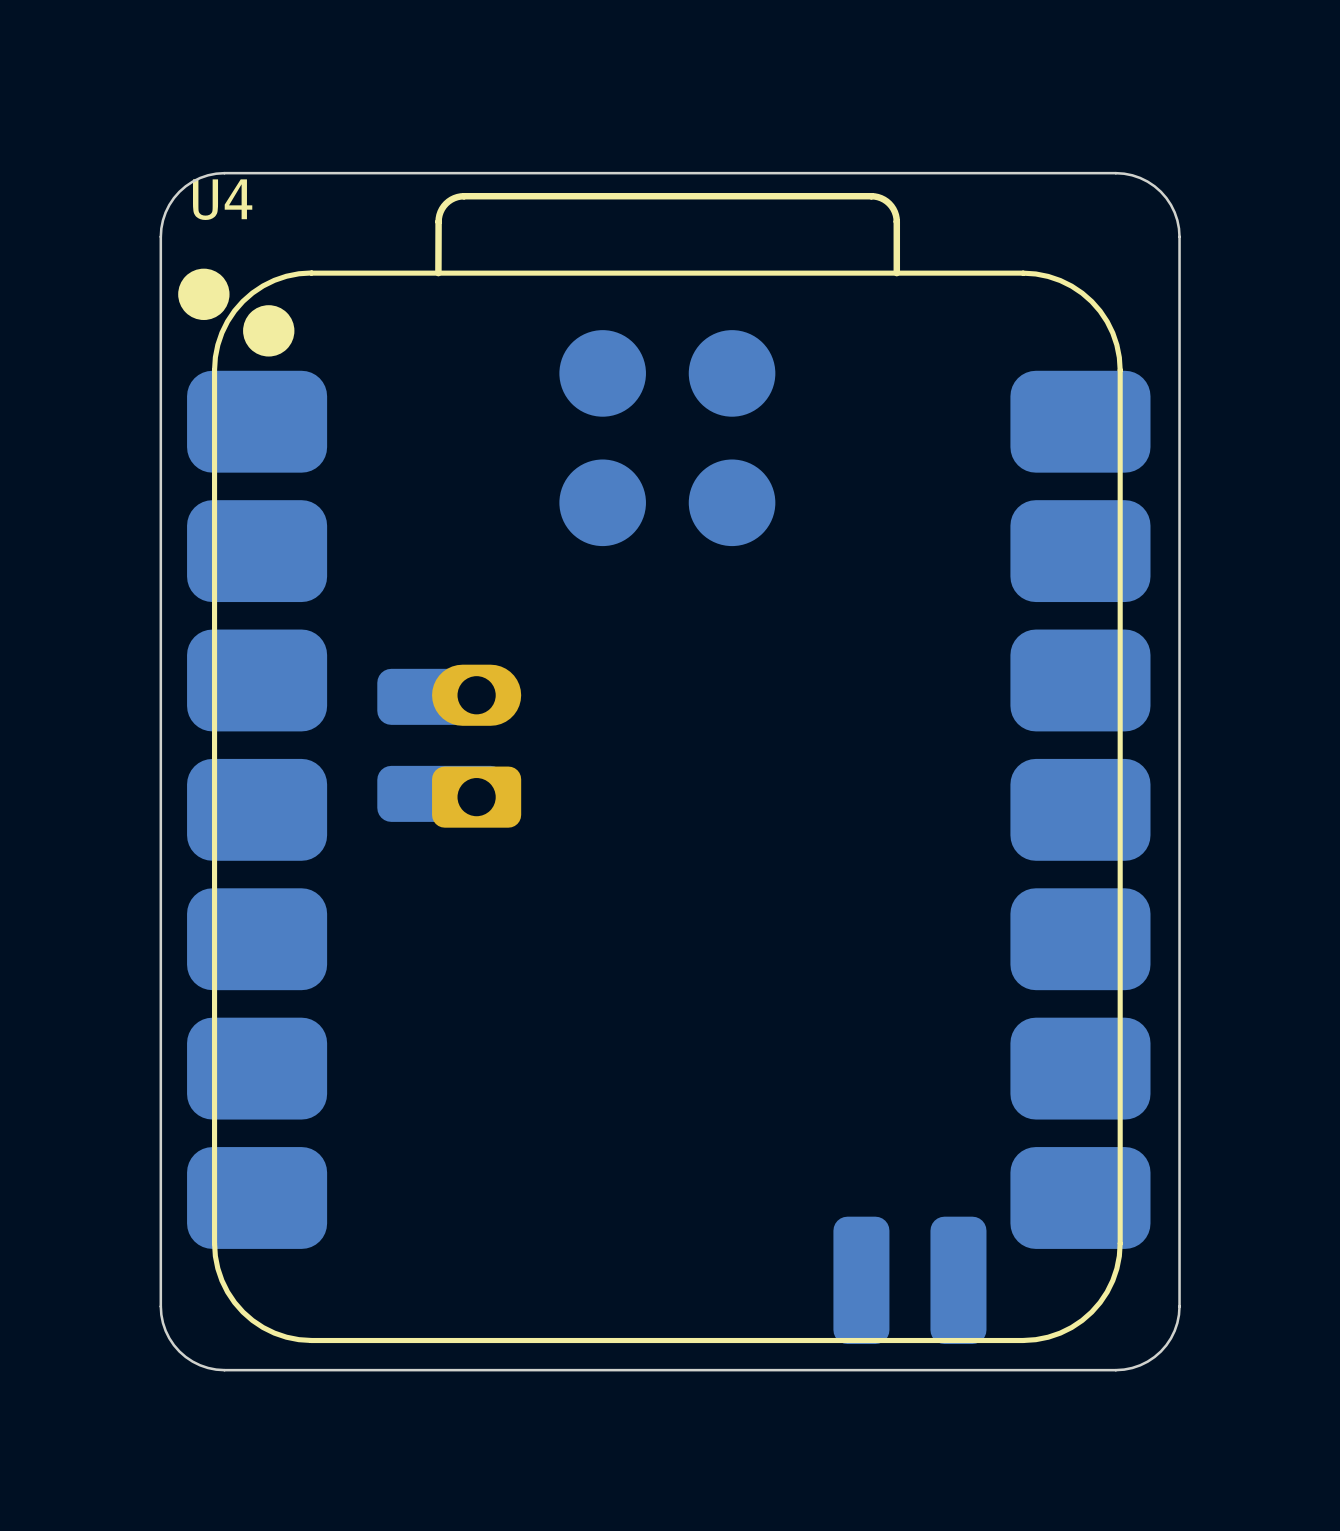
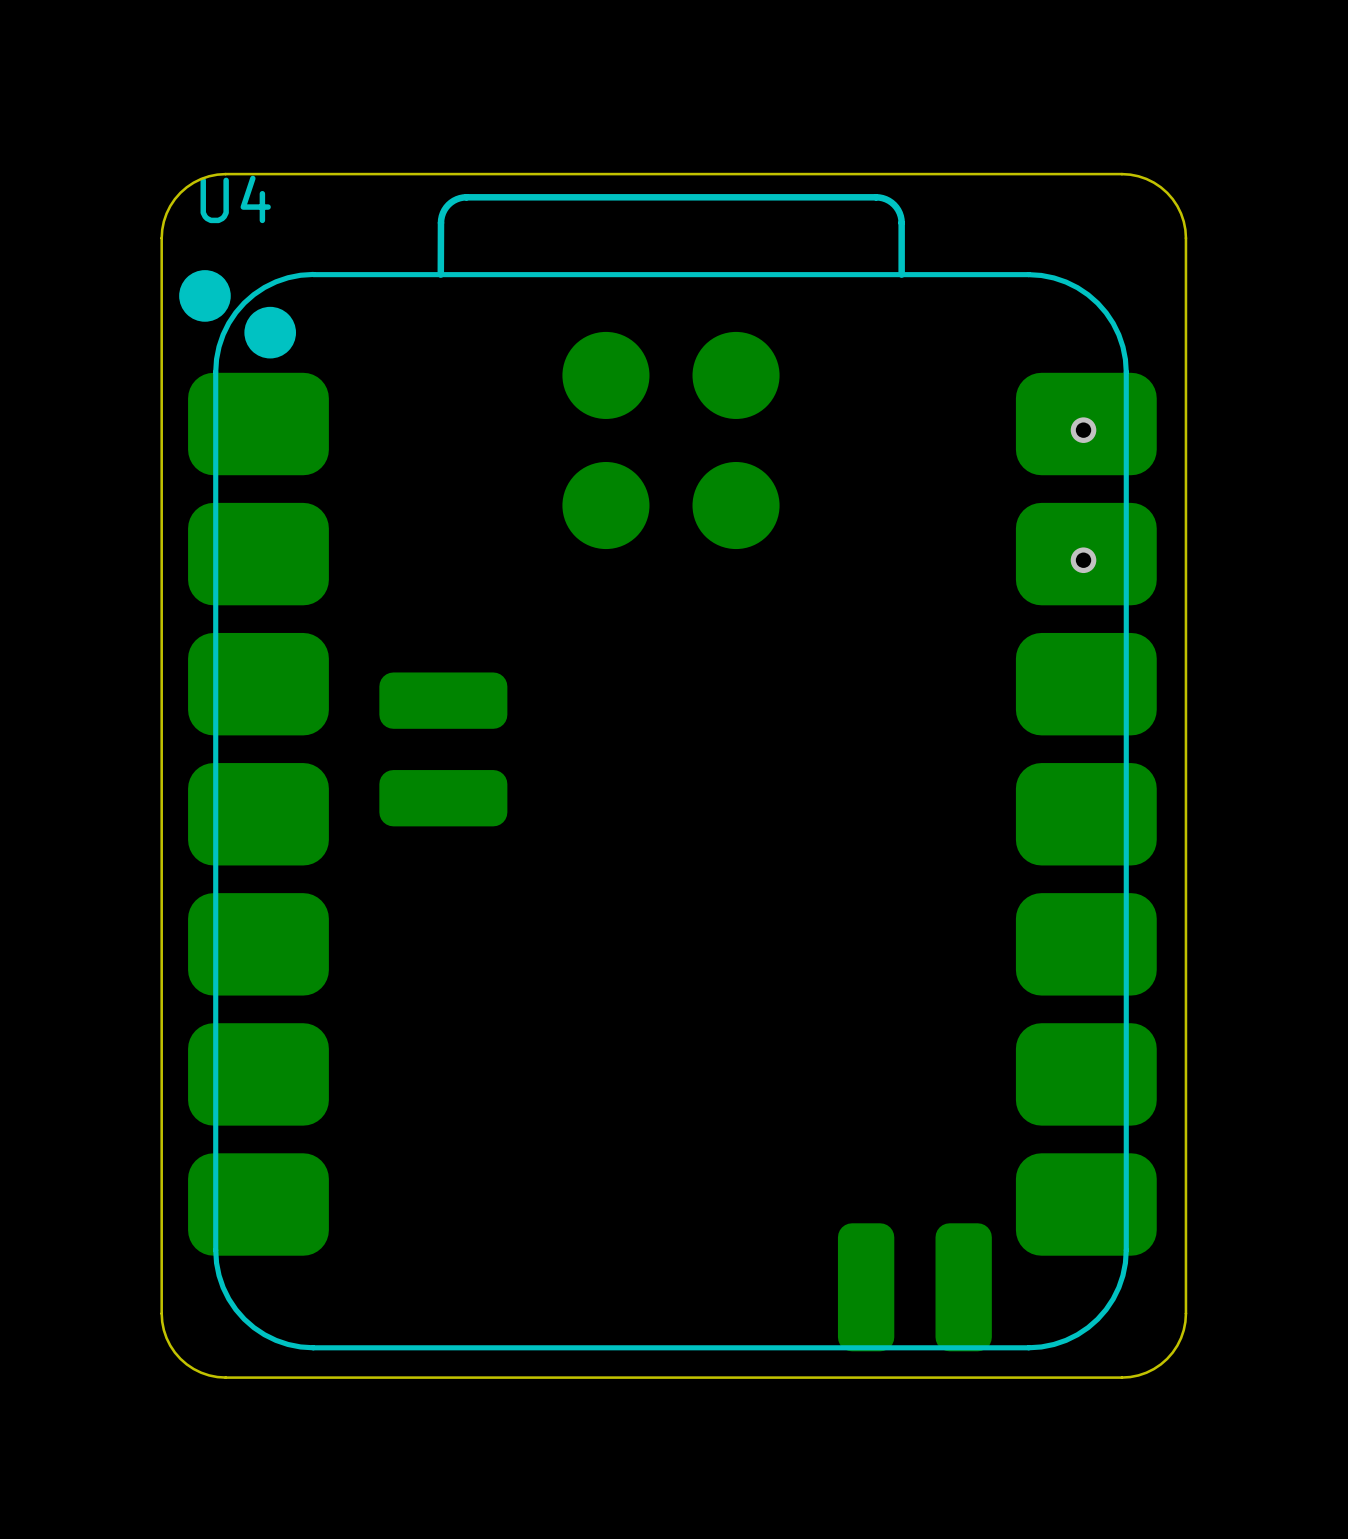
via: none -> (1083, 430)
via: none -> (1083, 560)
part: (476, 746) -> none

